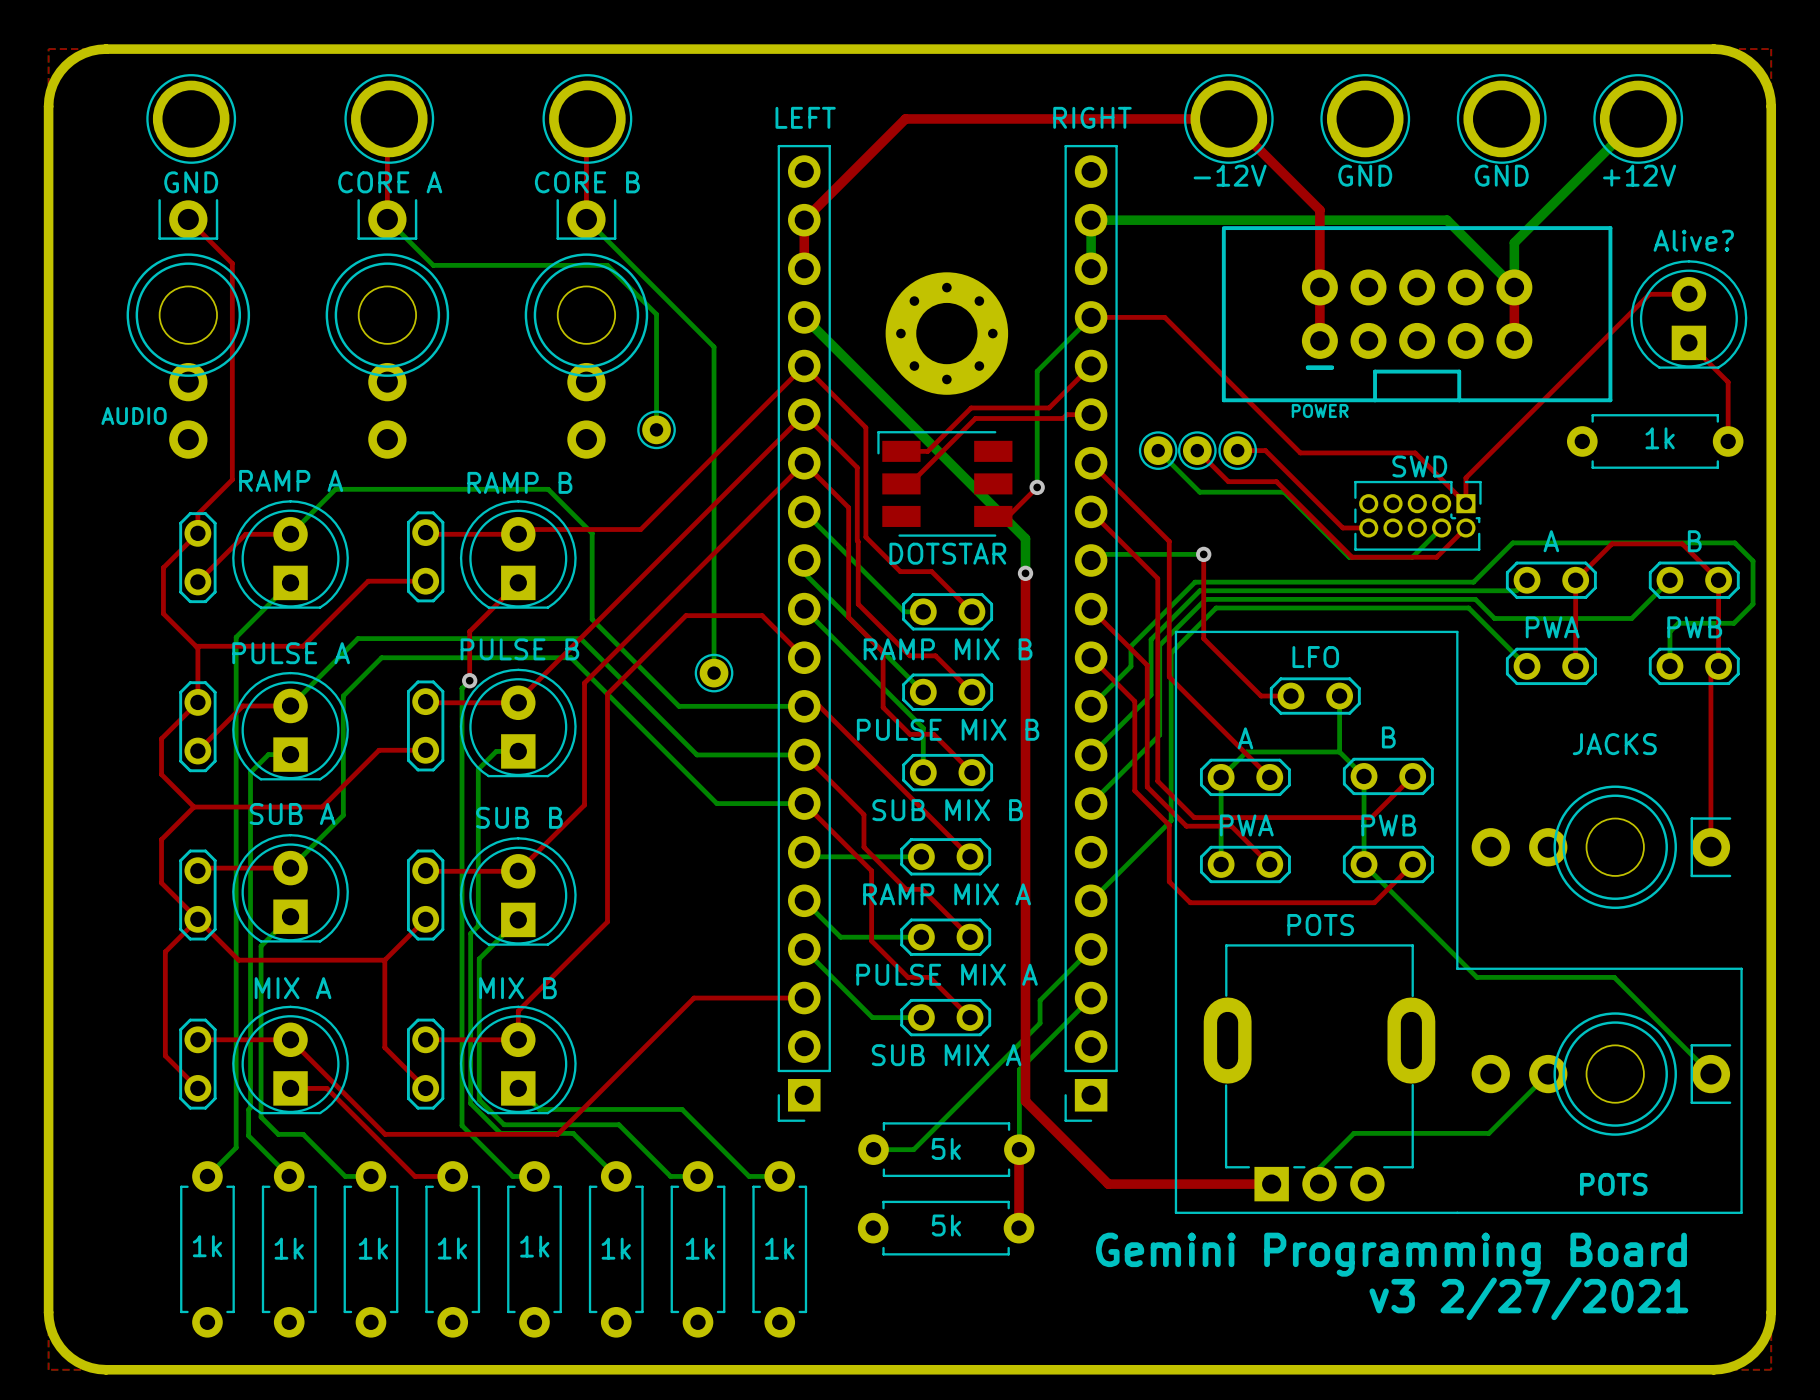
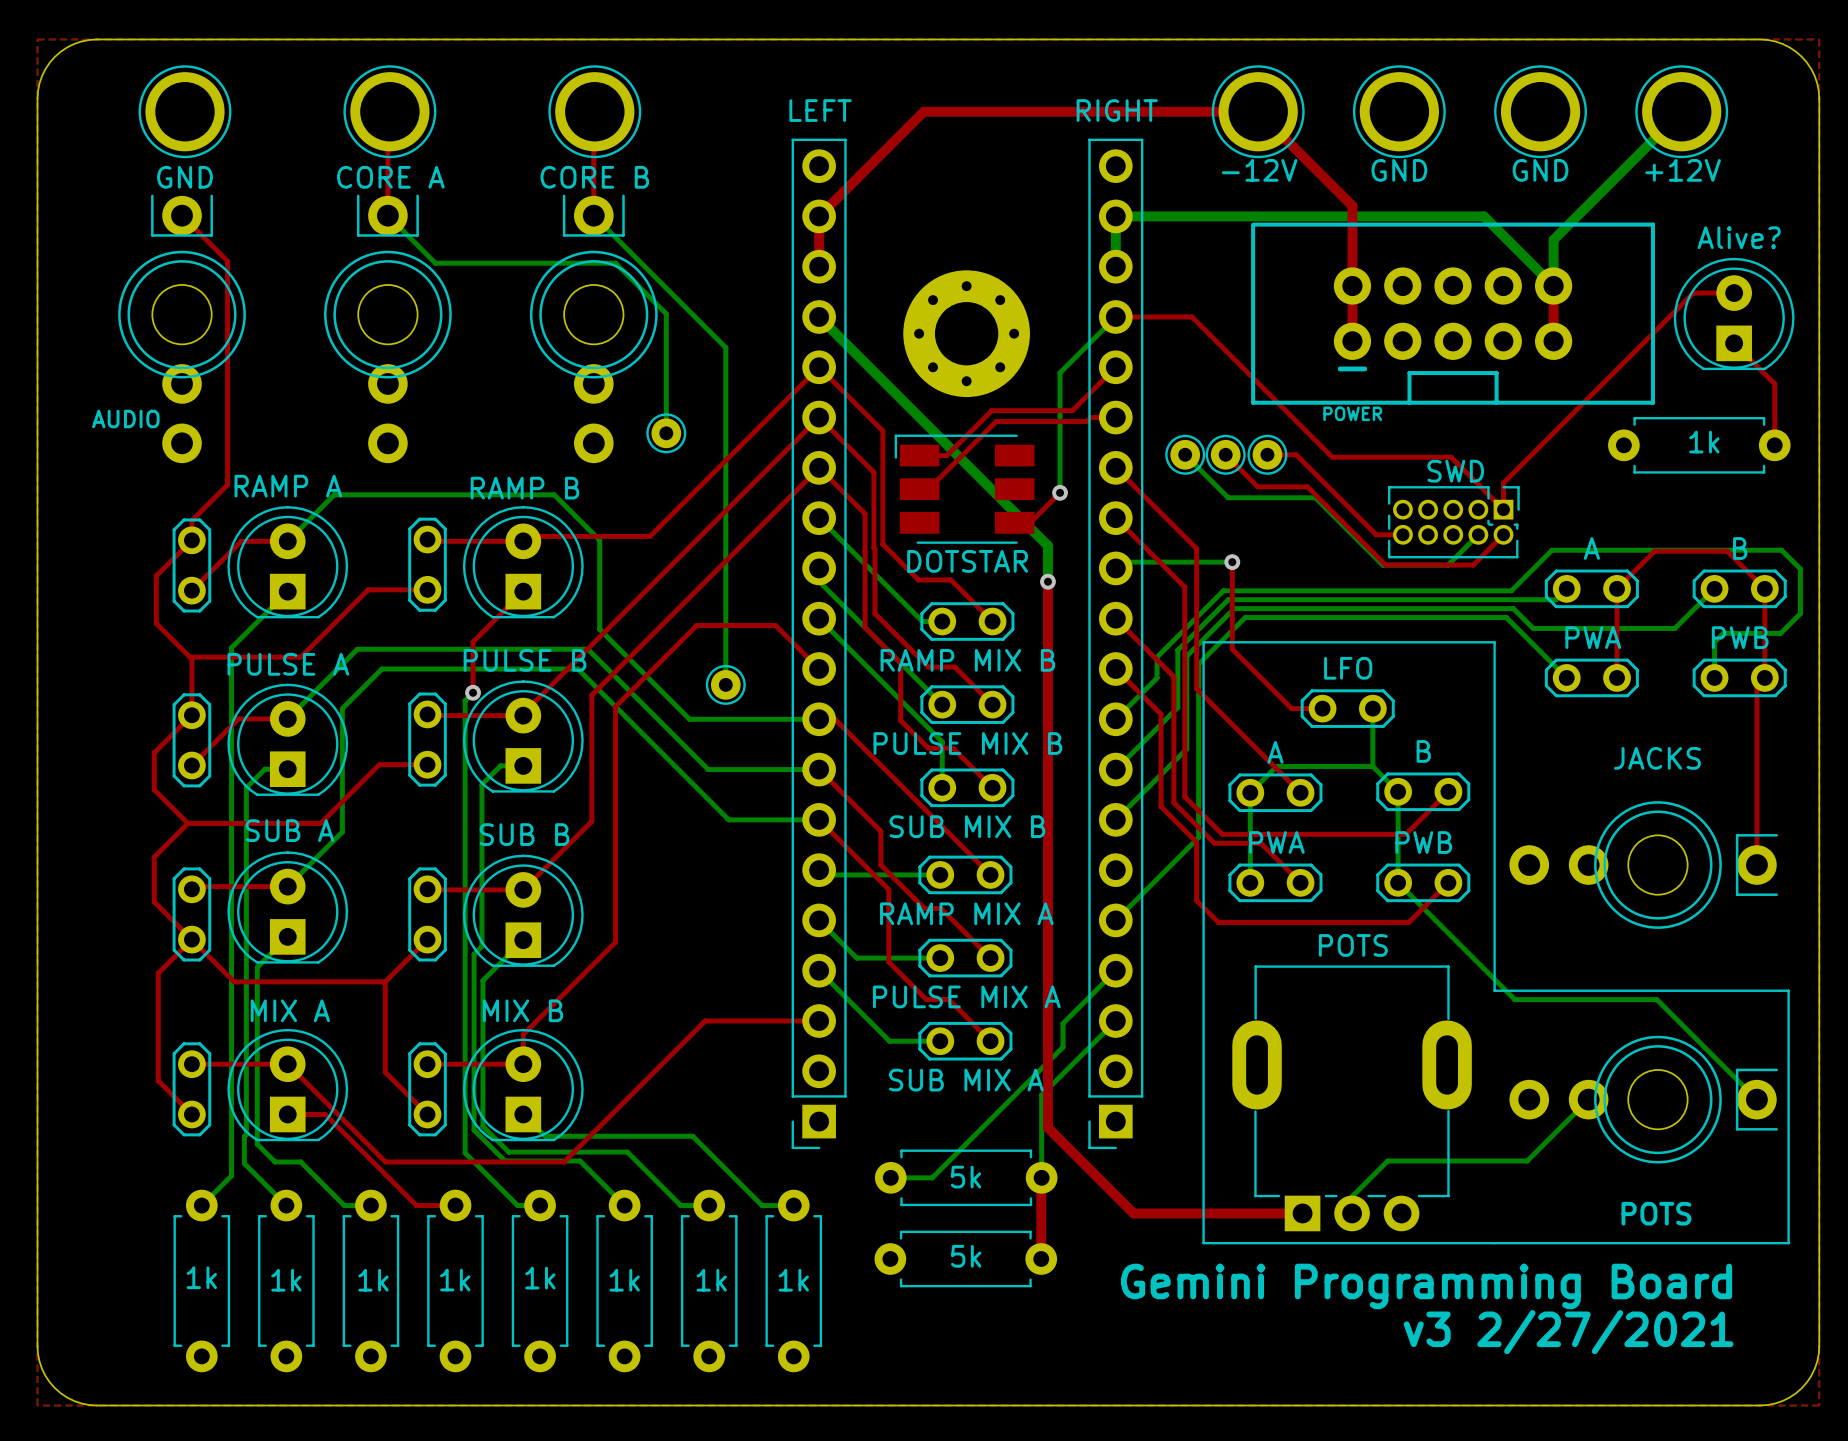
board edge width: thick (106, 49) (1713, 49) (1728, 51) (1748, 60) (1759, 71) (1766, 84) (1771, 106) (1771, 1312) (1769, 1327) (1759, 1347) (1748, 1357) (1735, 1365) (1713, 1369) (106, 1369) (91, 1367) (71, 1357) (60, 1347) (52, 1334) (48, 1312) (48, 106) (52, 84) (65, 65) (84, 53) (106, 49) -> thin (96, 39) (1759, 39) (1775, 41) (1796, 51) (1807, 62) (1814, 76) (1819, 98) (1819, 1346) (1817, 1361) (1807, 1382) (1796, 1393) (1782, 1400) (1759, 1405) (96, 1405) (81, 1403) (60, 1393) (49, 1382) (42, 1368) (37, 1346) (37, 98) (42, 76) (54, 56) (74, 43) (96, 39)

